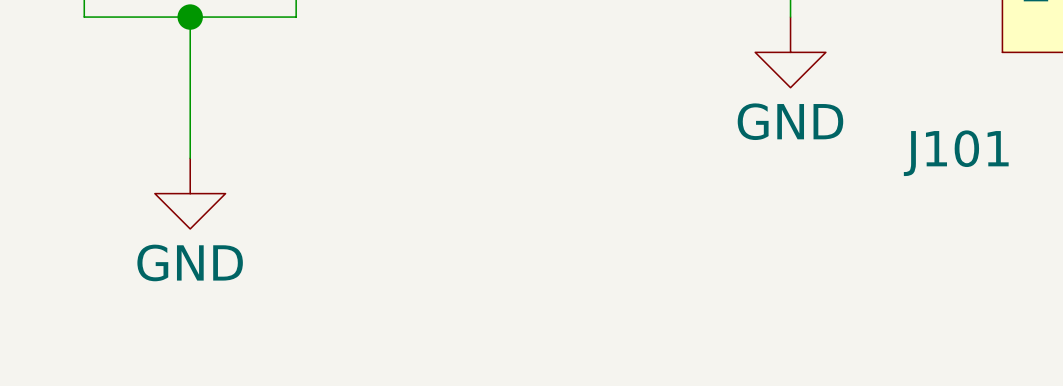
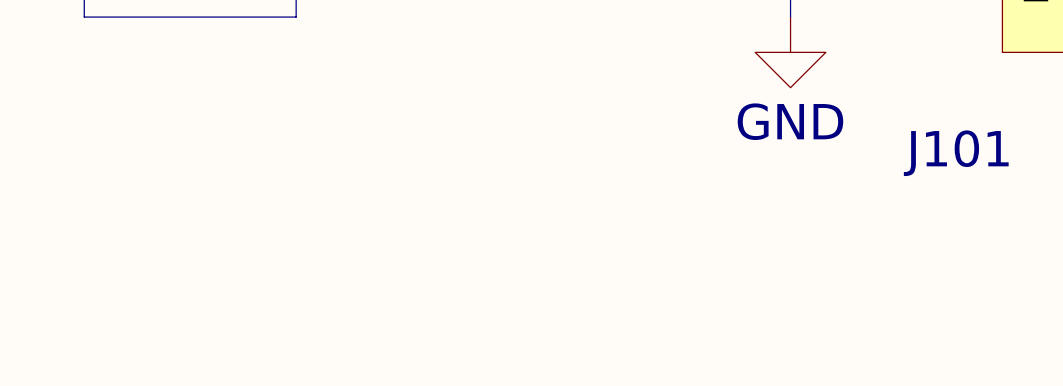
wire: (190, 17) (190, 158) -> none
junction: (190, 17) -> none
power symbol: GND (190, 193) -> none

